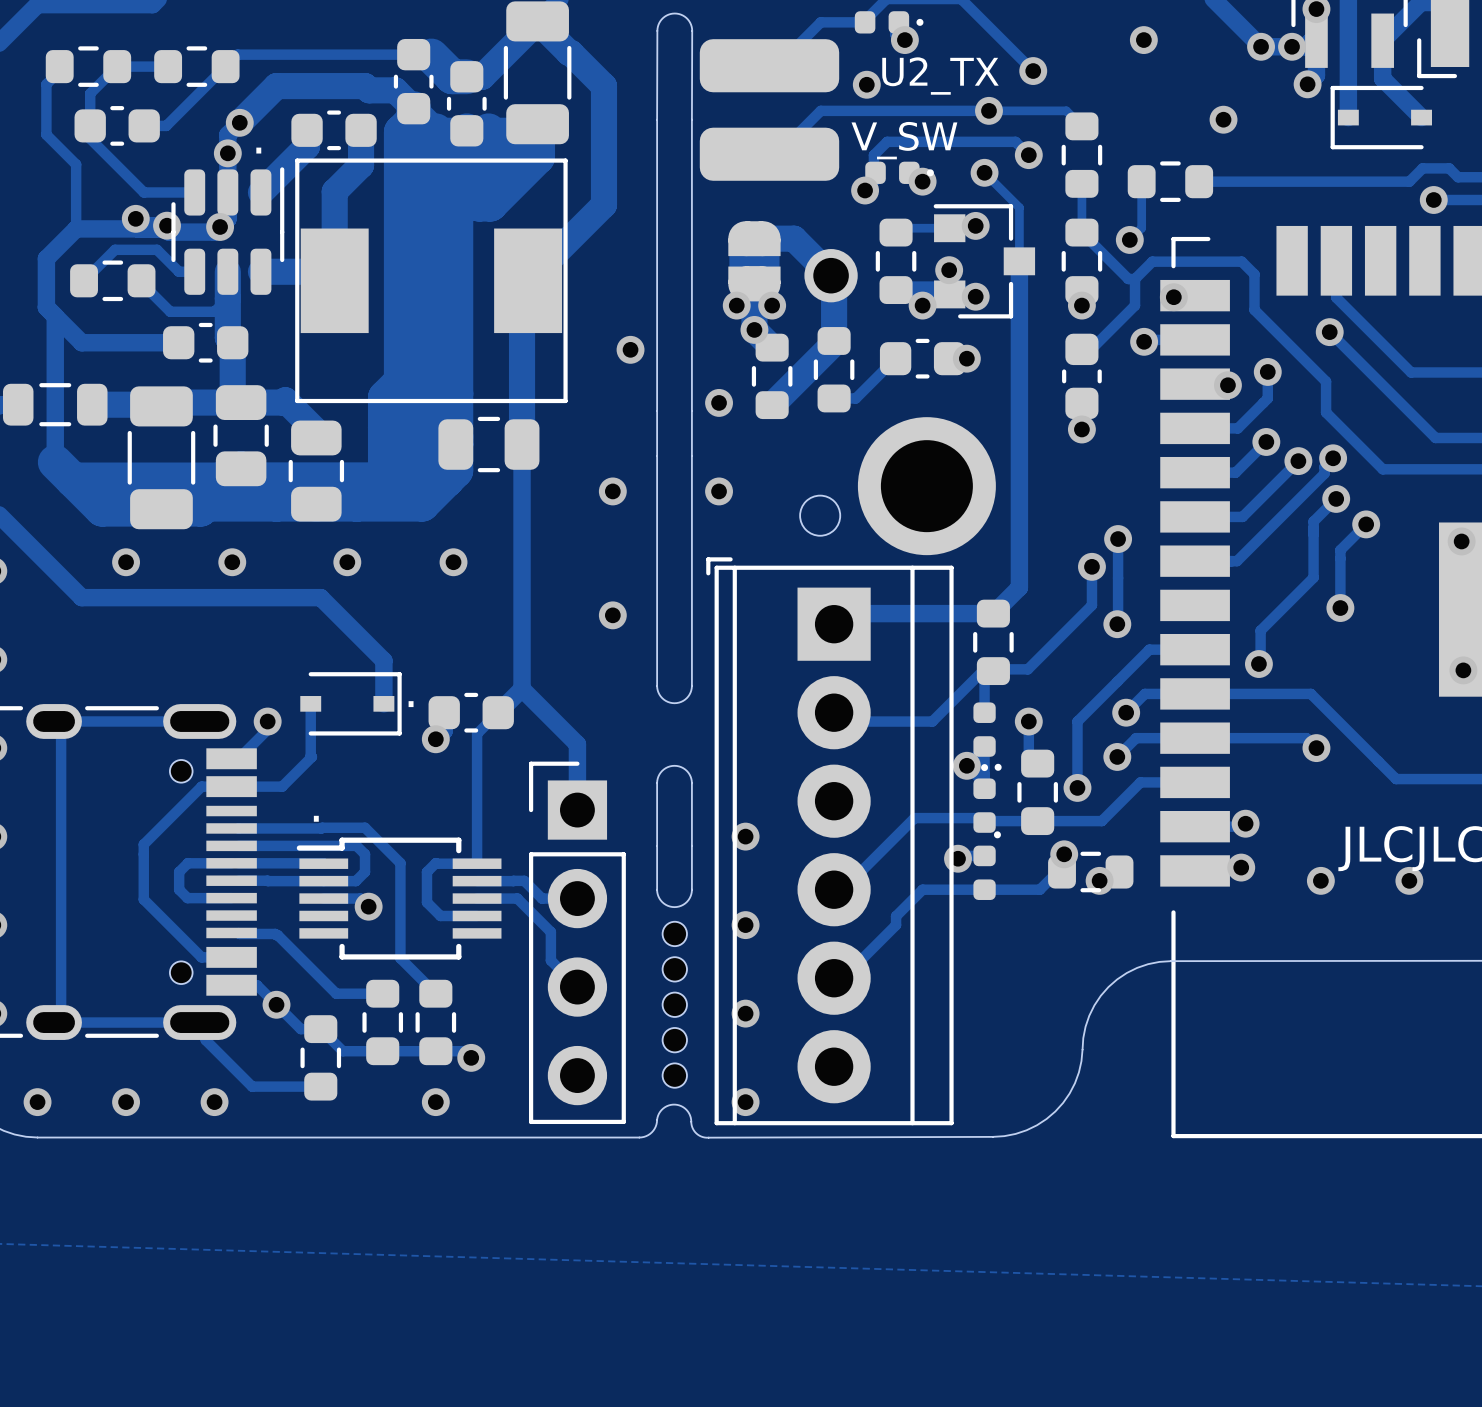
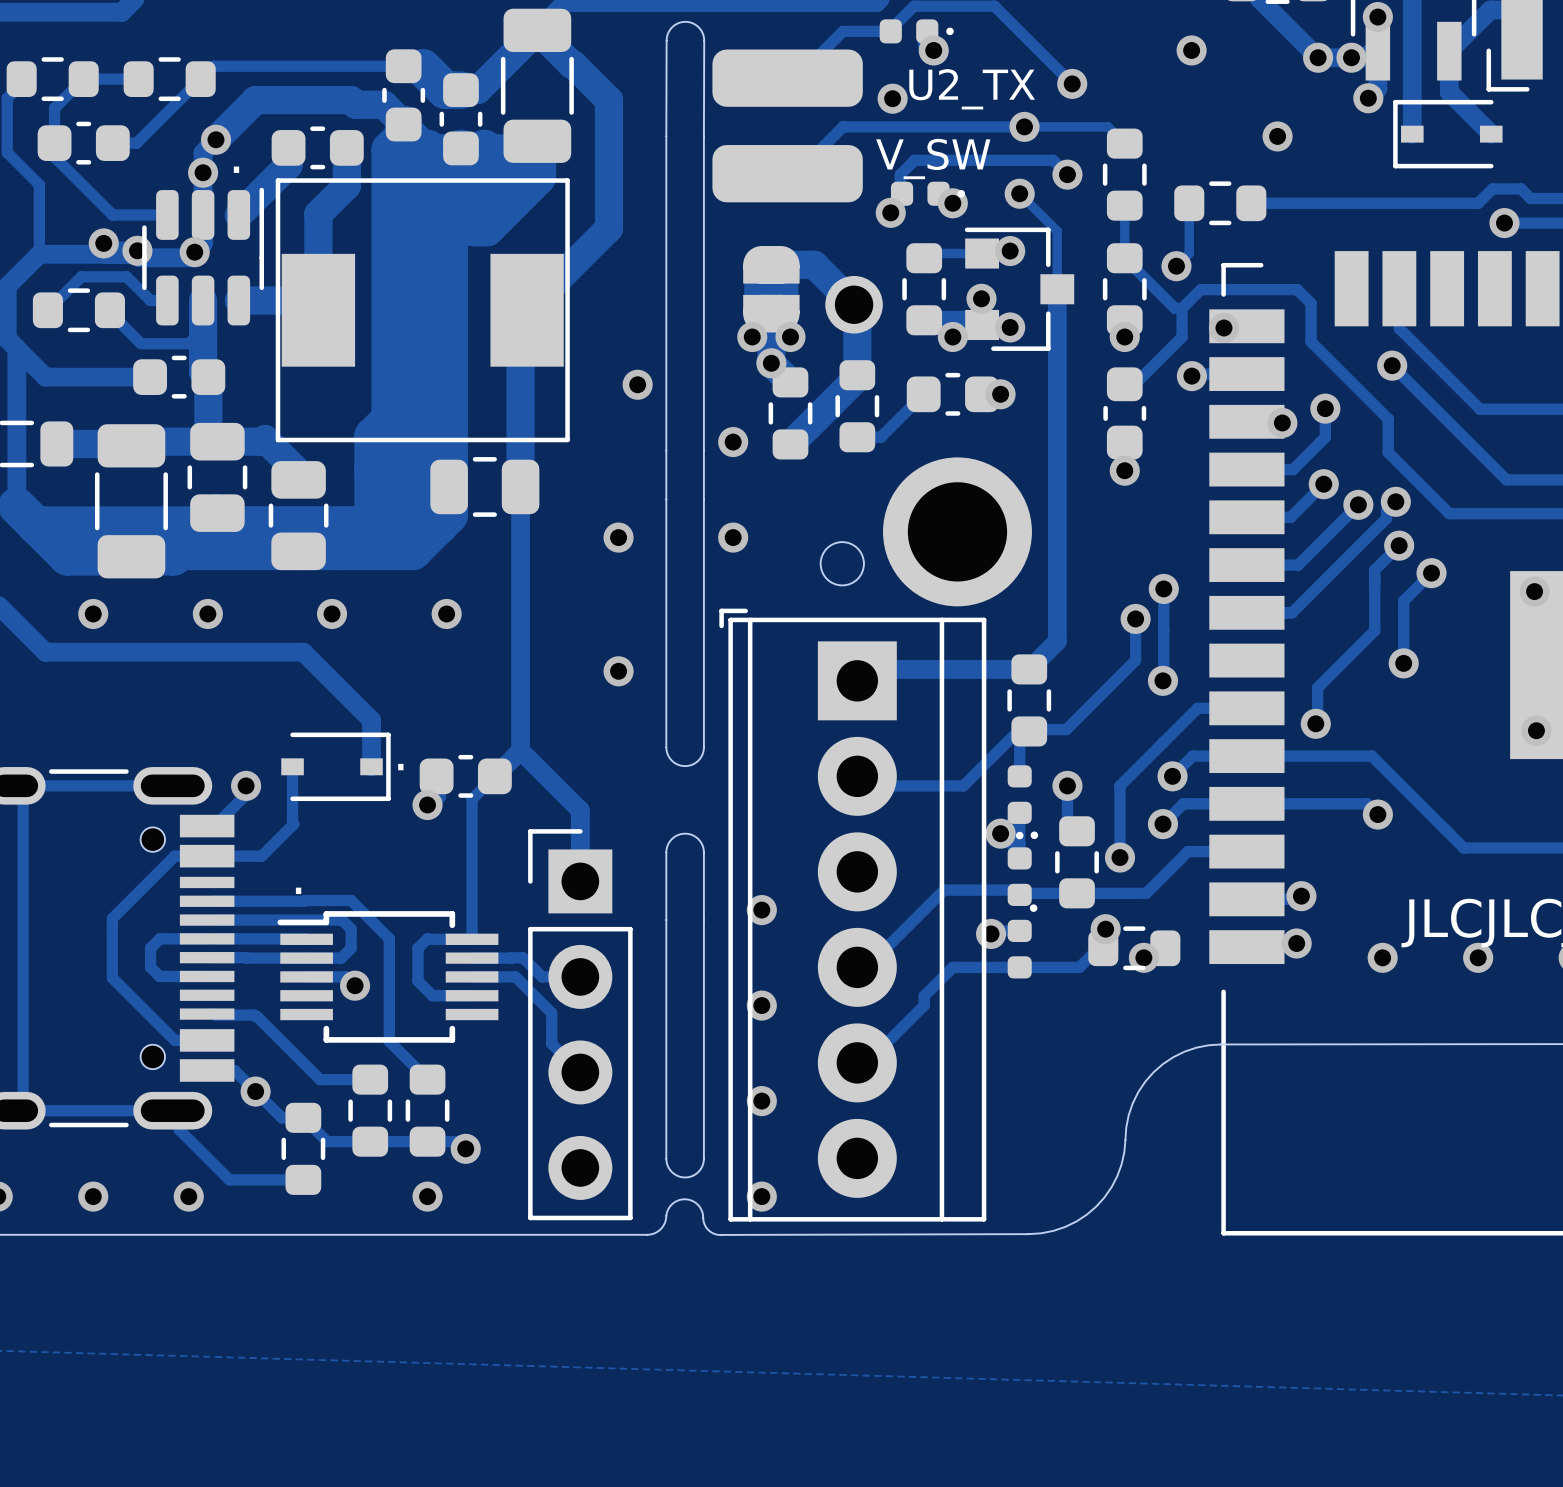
board edge: (657, 889) (662, 902) (674, 907) (686, 902) (691, 889) -> (666, 967) (666, 1161) (673, 1173) (685, 1177) (696, 1173) (703, 1161) (703, 967)
part: (674, 933) -> none
part: (674, 969) -> none
part: (674, 1004) -> none
part: (674, 1040) -> none
part: (674, 1075) -> none

